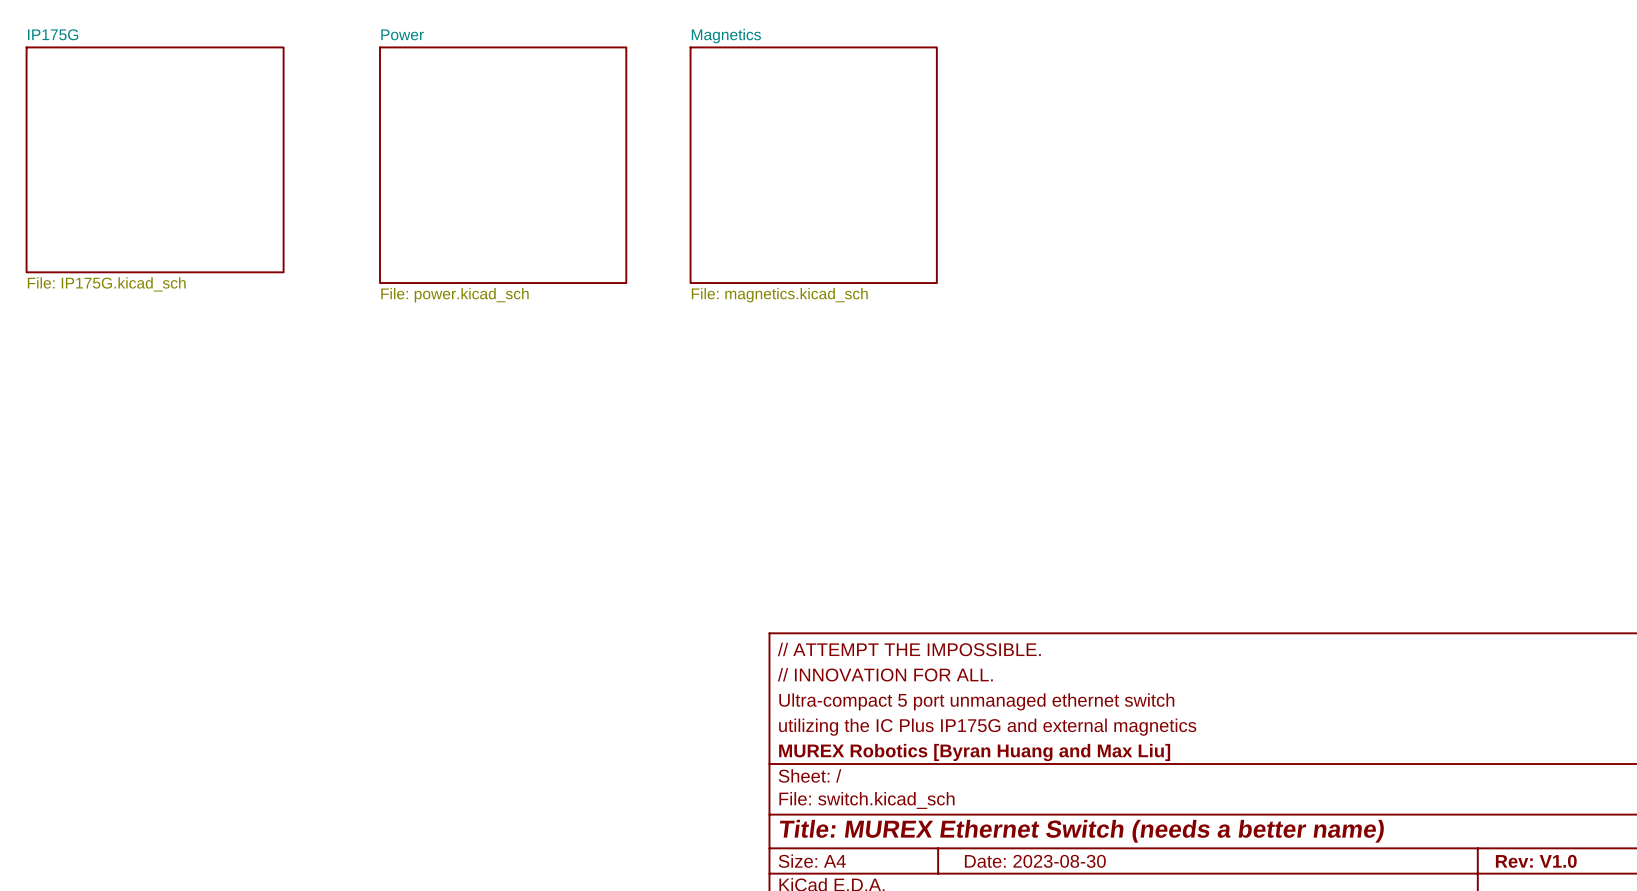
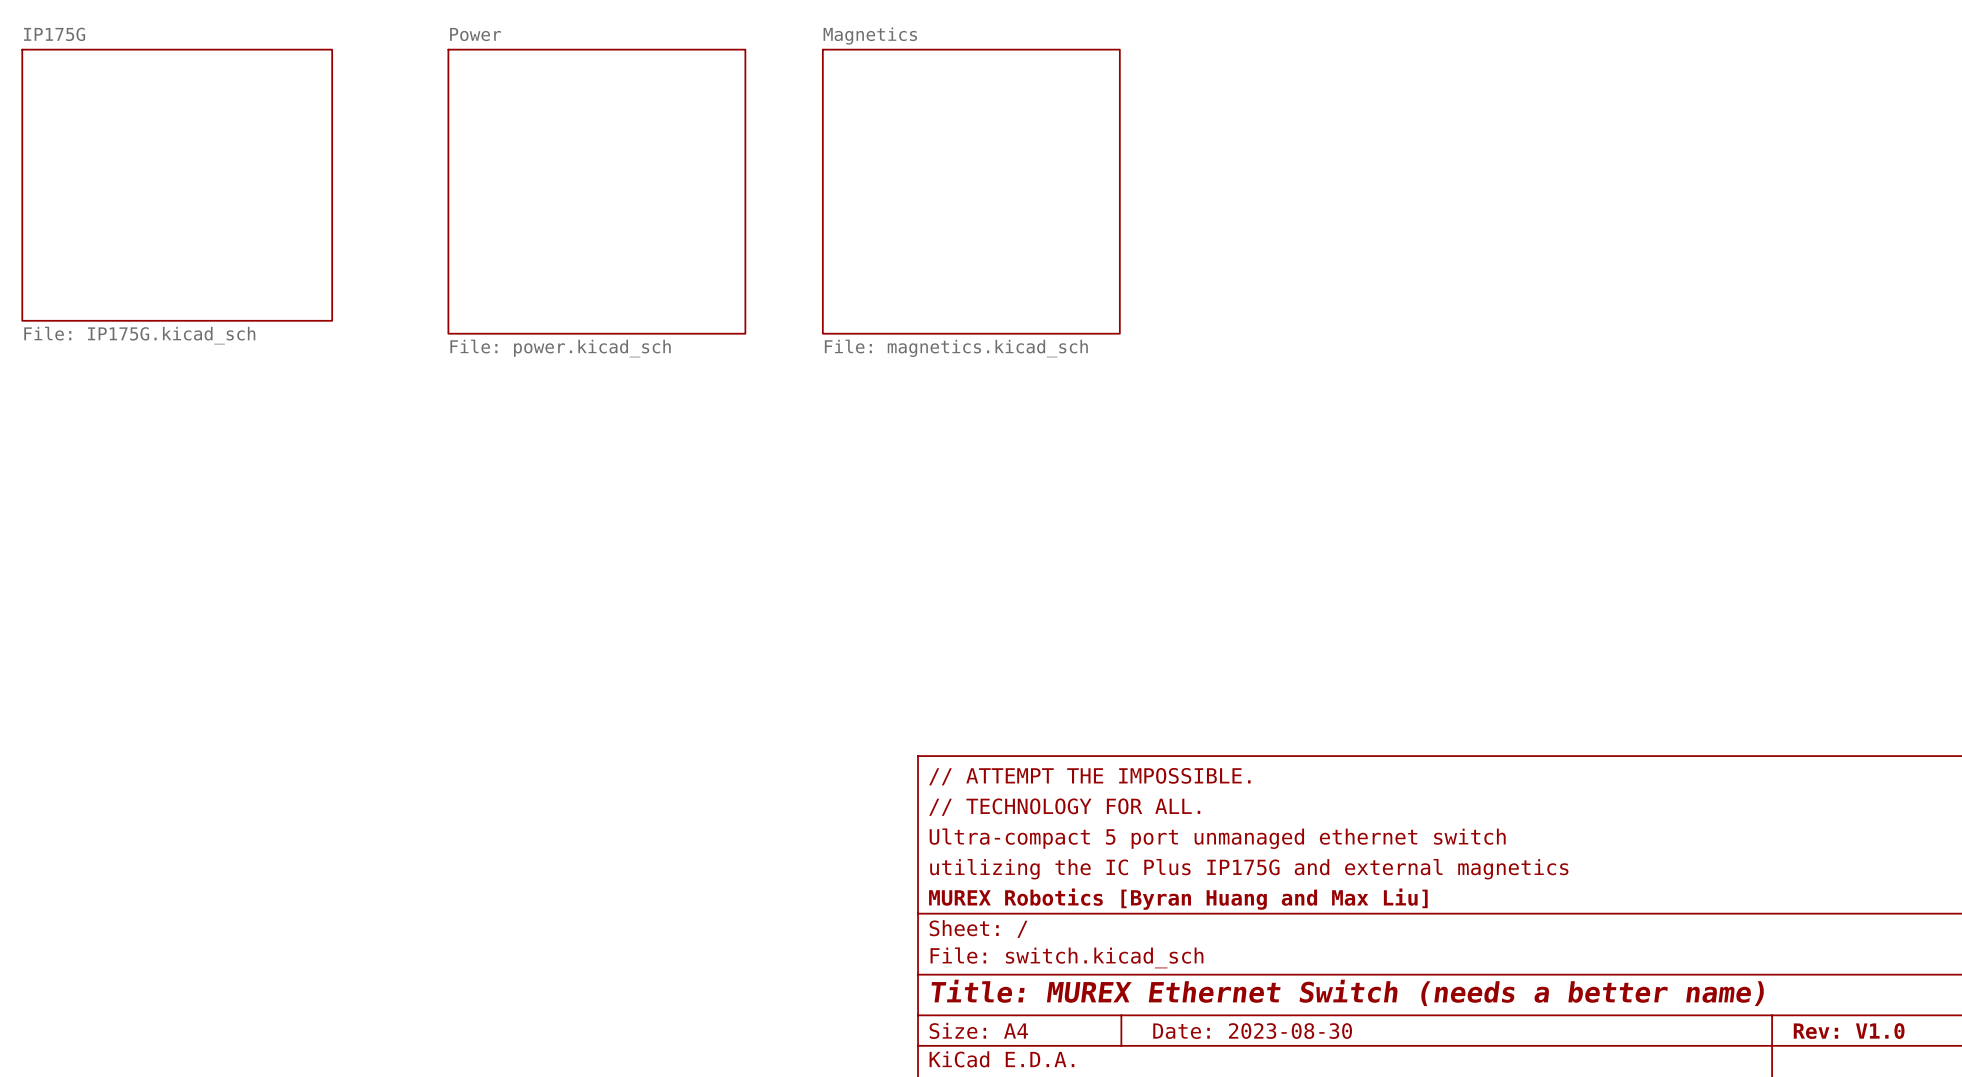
title block: // INNOVATION FOR ALL. (885, 674) -> // TECHNOLOGY FOR ALL. (1064, 807)

